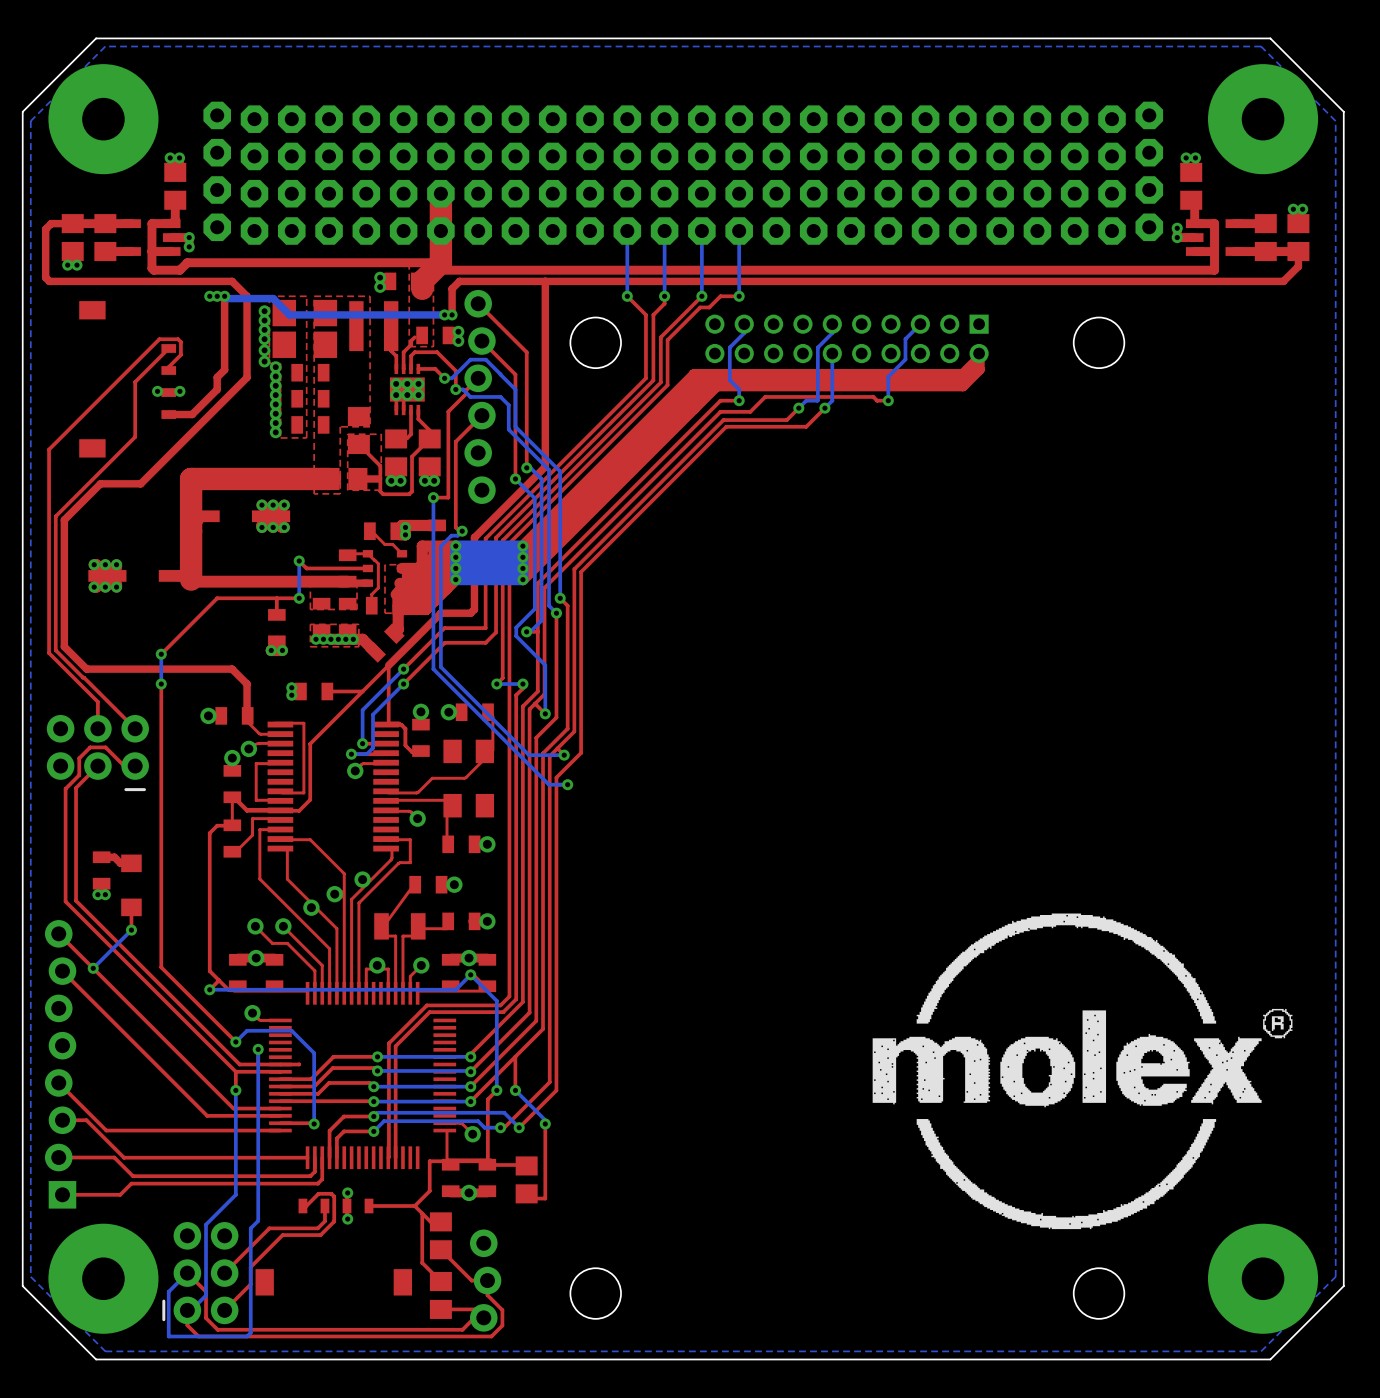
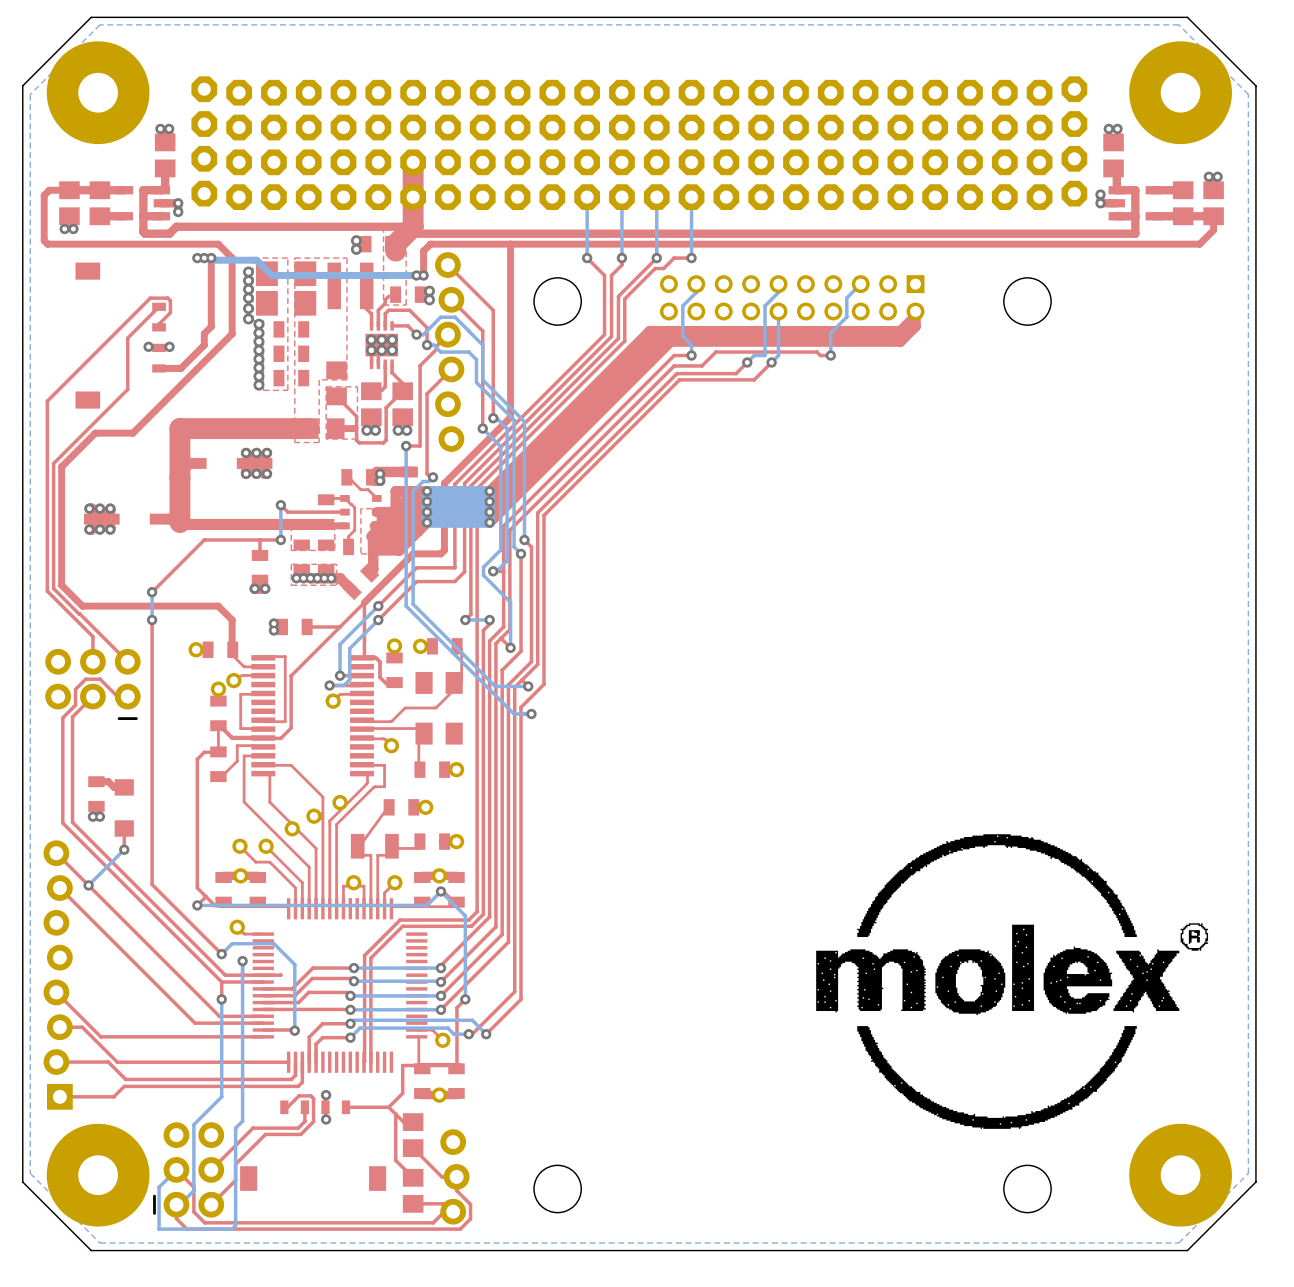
top track: (515, 1056) (515, 1086) -> none
bottom track: (515, 1090) (545, 1120) (545, 1127) -> none
via: (515, 1090) -> none
top track: (545, 1123) (545, 1198) (531, 1198) (526, 1193) -> none
via: (545, 1123) -> none
top track: (526, 1164) (489, 1164) -> none
part: (526, 1179) -> none

